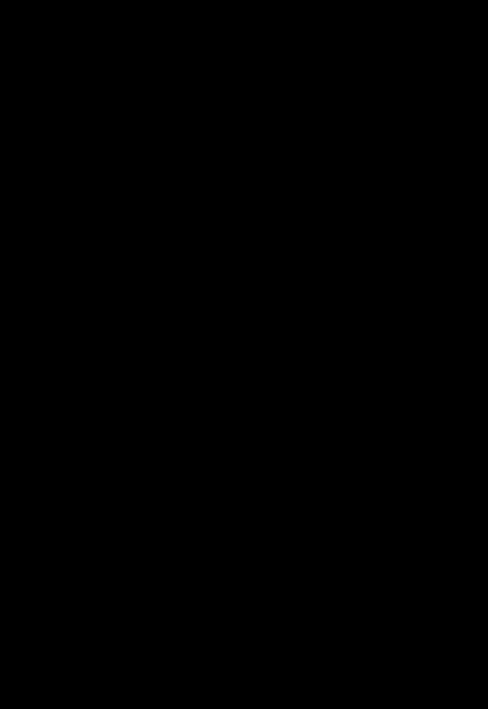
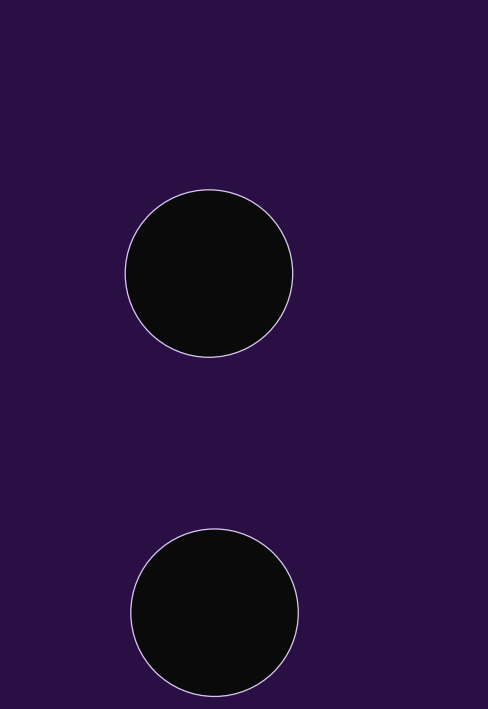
part: none -> (208, 273)
part: none -> (214, 612)

